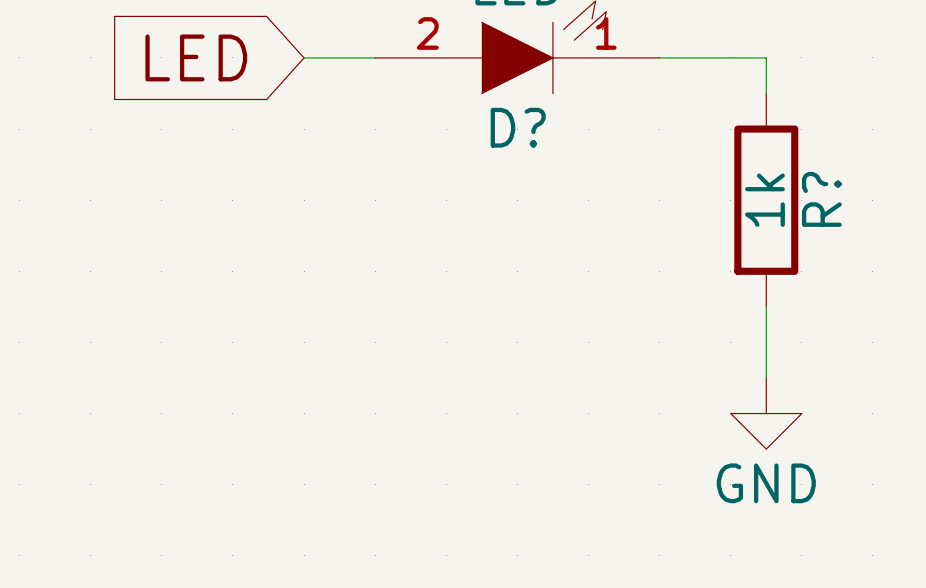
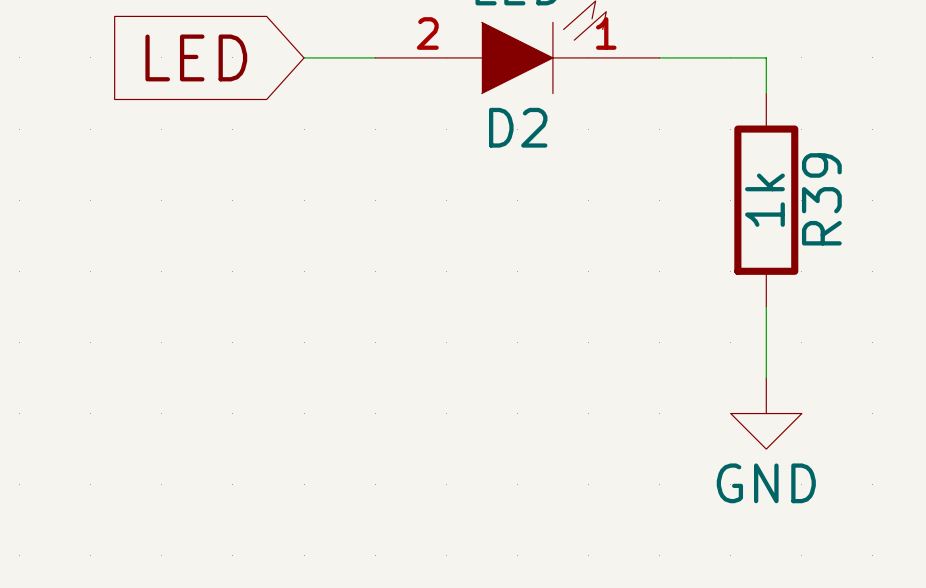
D? name: D? (518, 127) -> D2 (518, 127)
R? name: R? (821, 199) -> R39 (821, 199)

